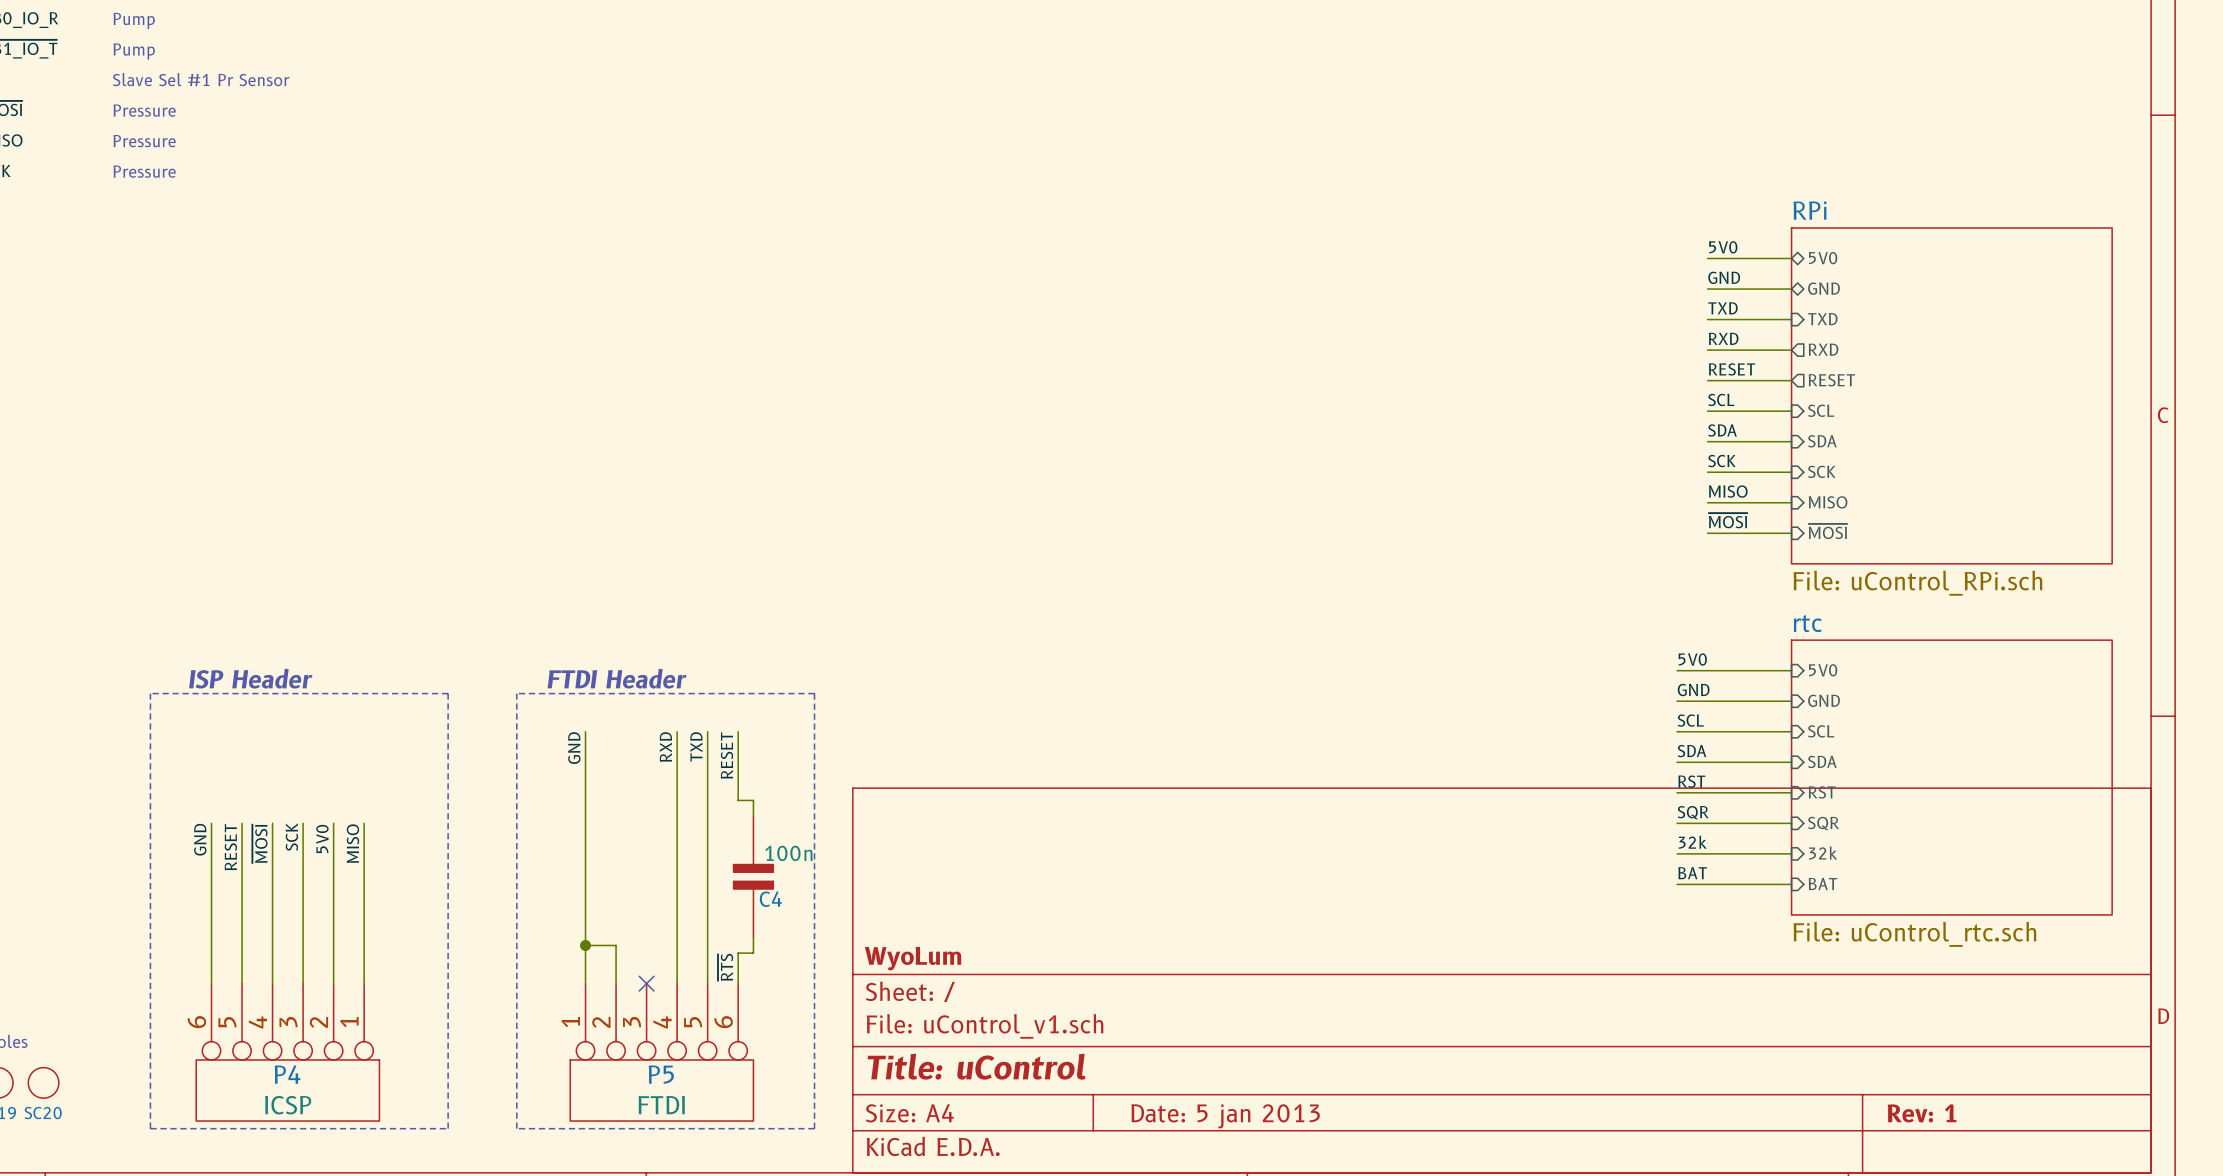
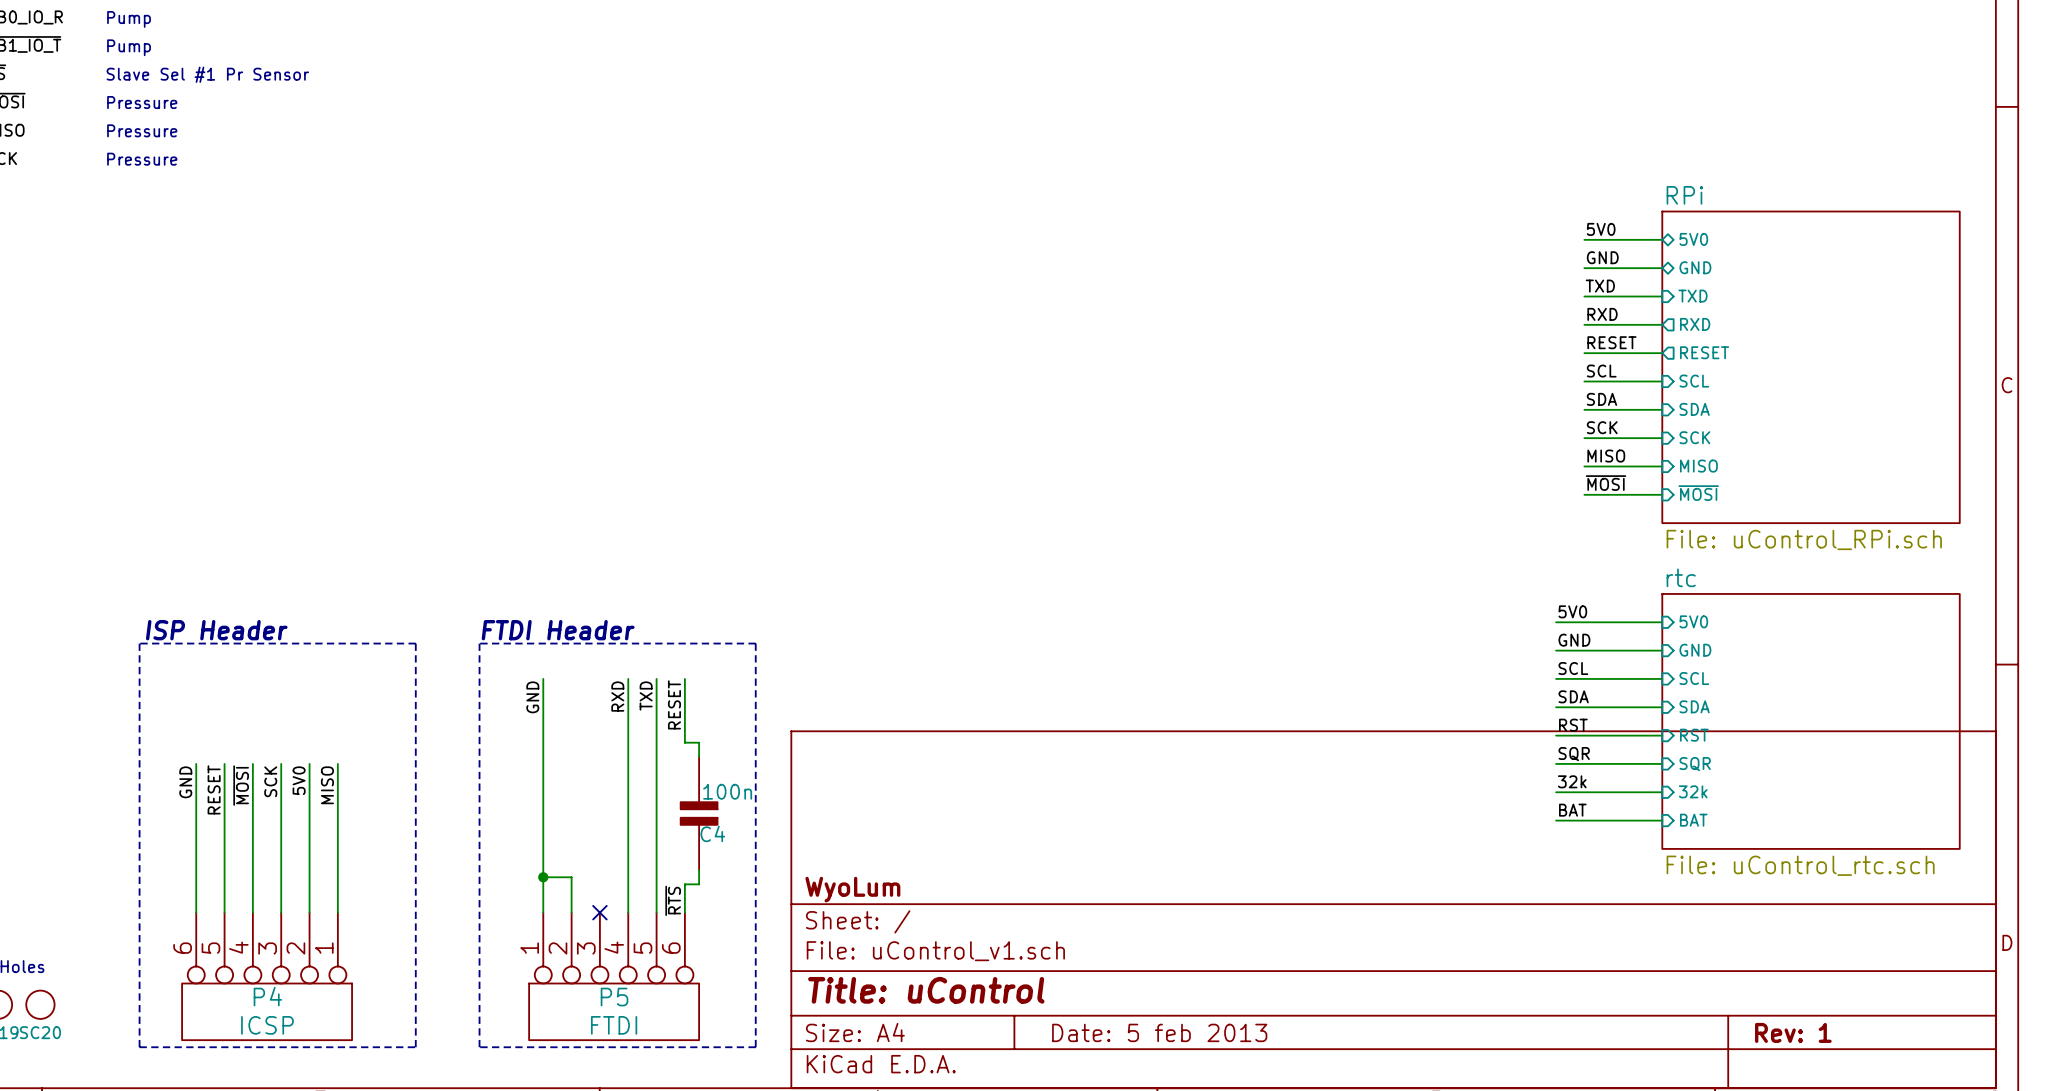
title block: Date: 5 jan 2013 (1225, 1116) -> Date: 5 feb 2013 (1159, 1032)

